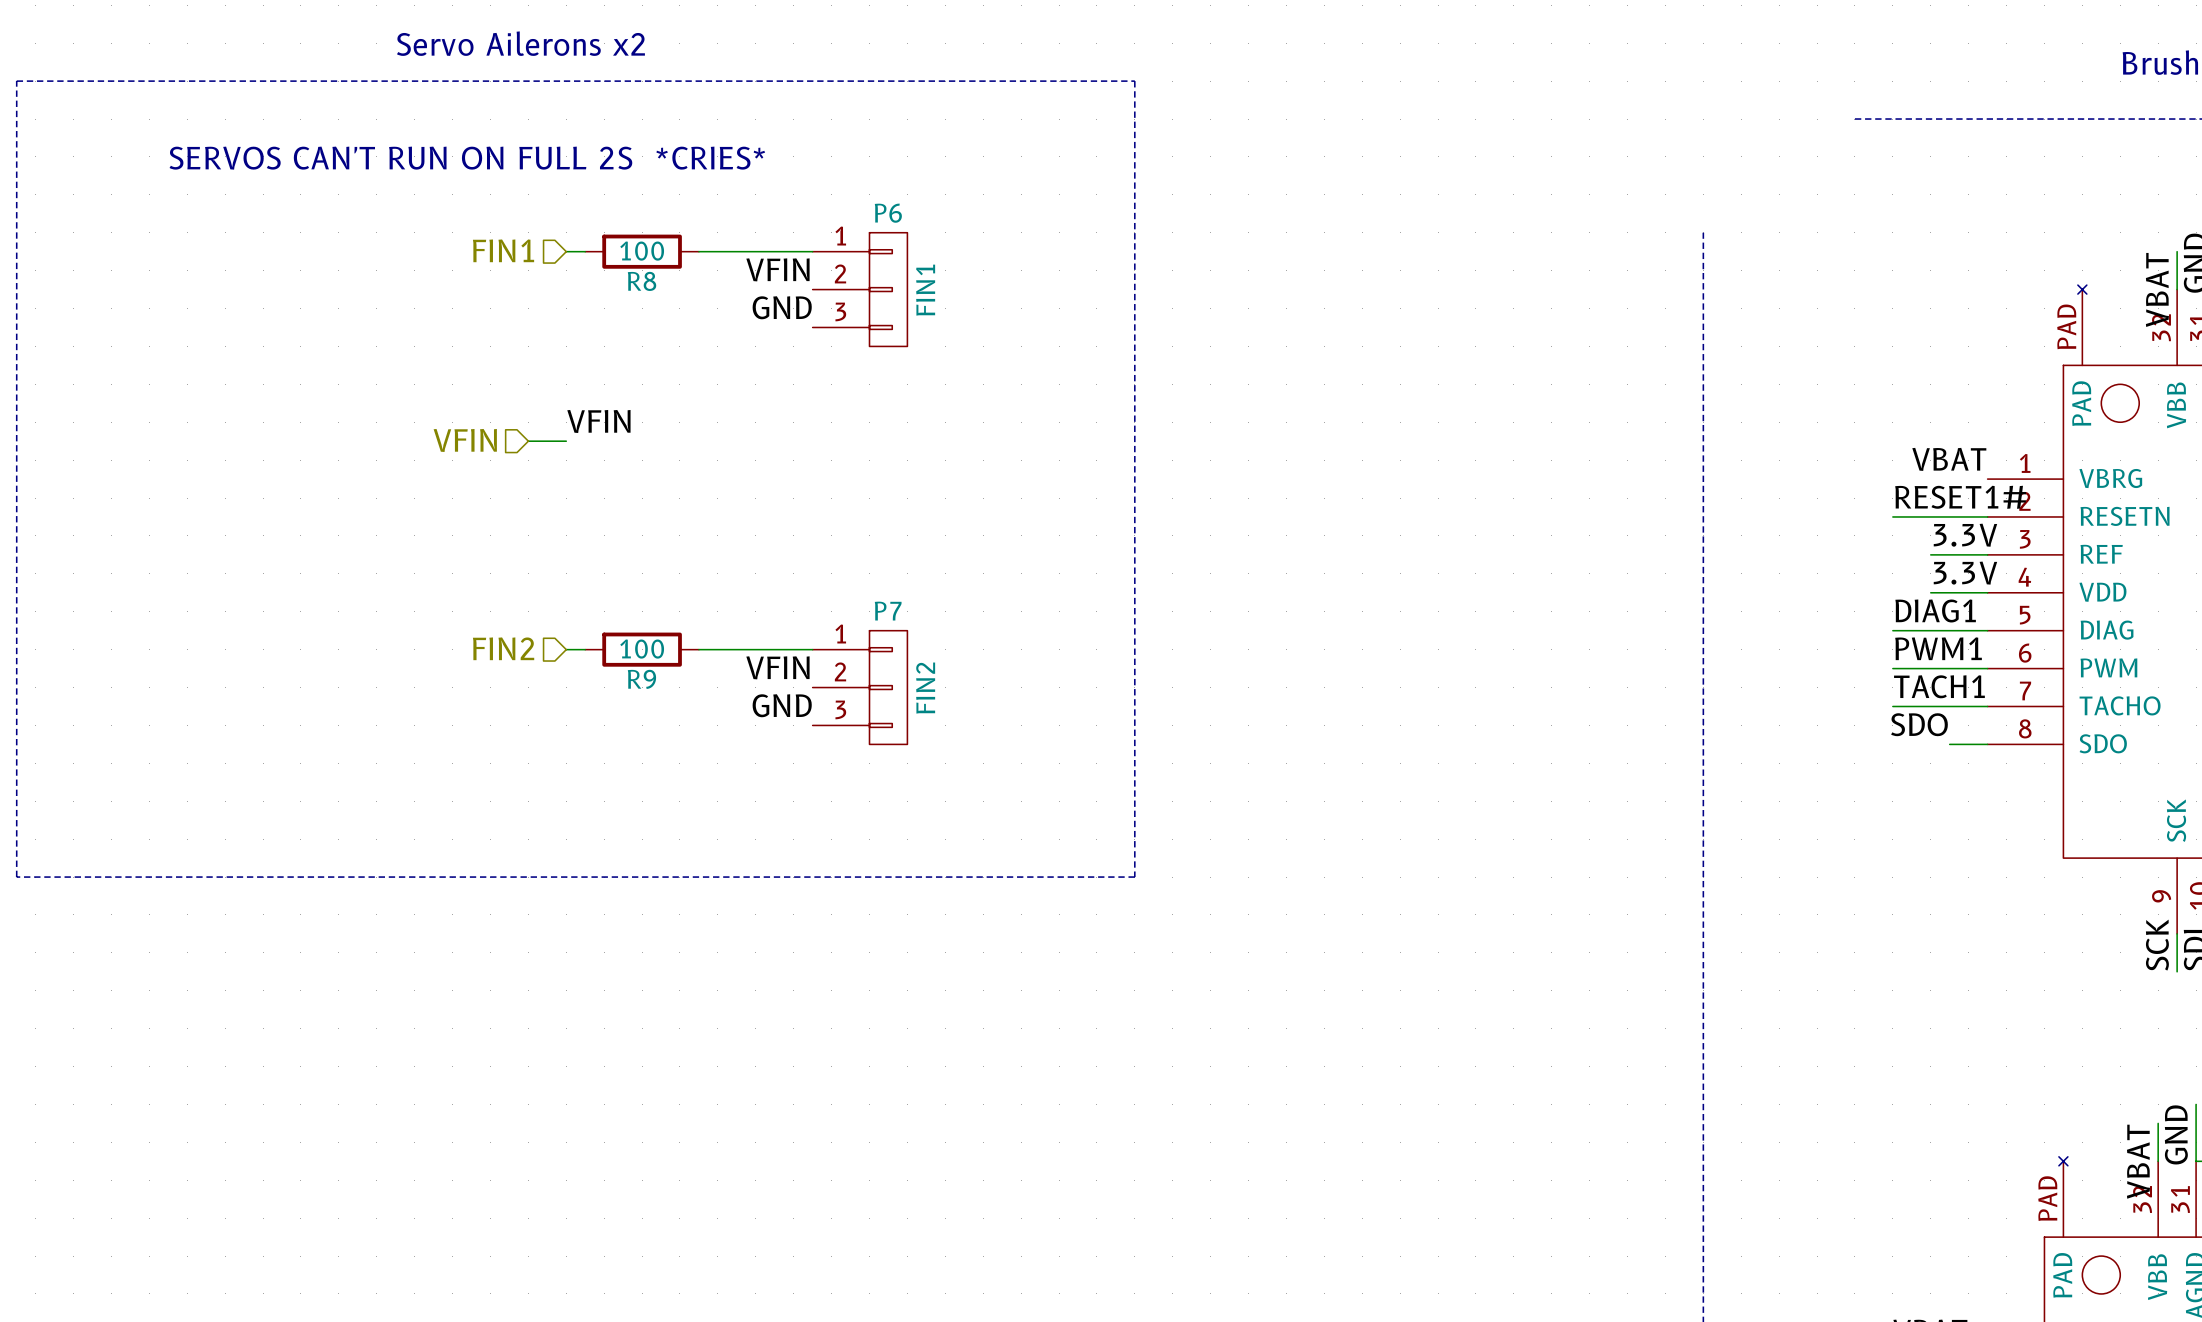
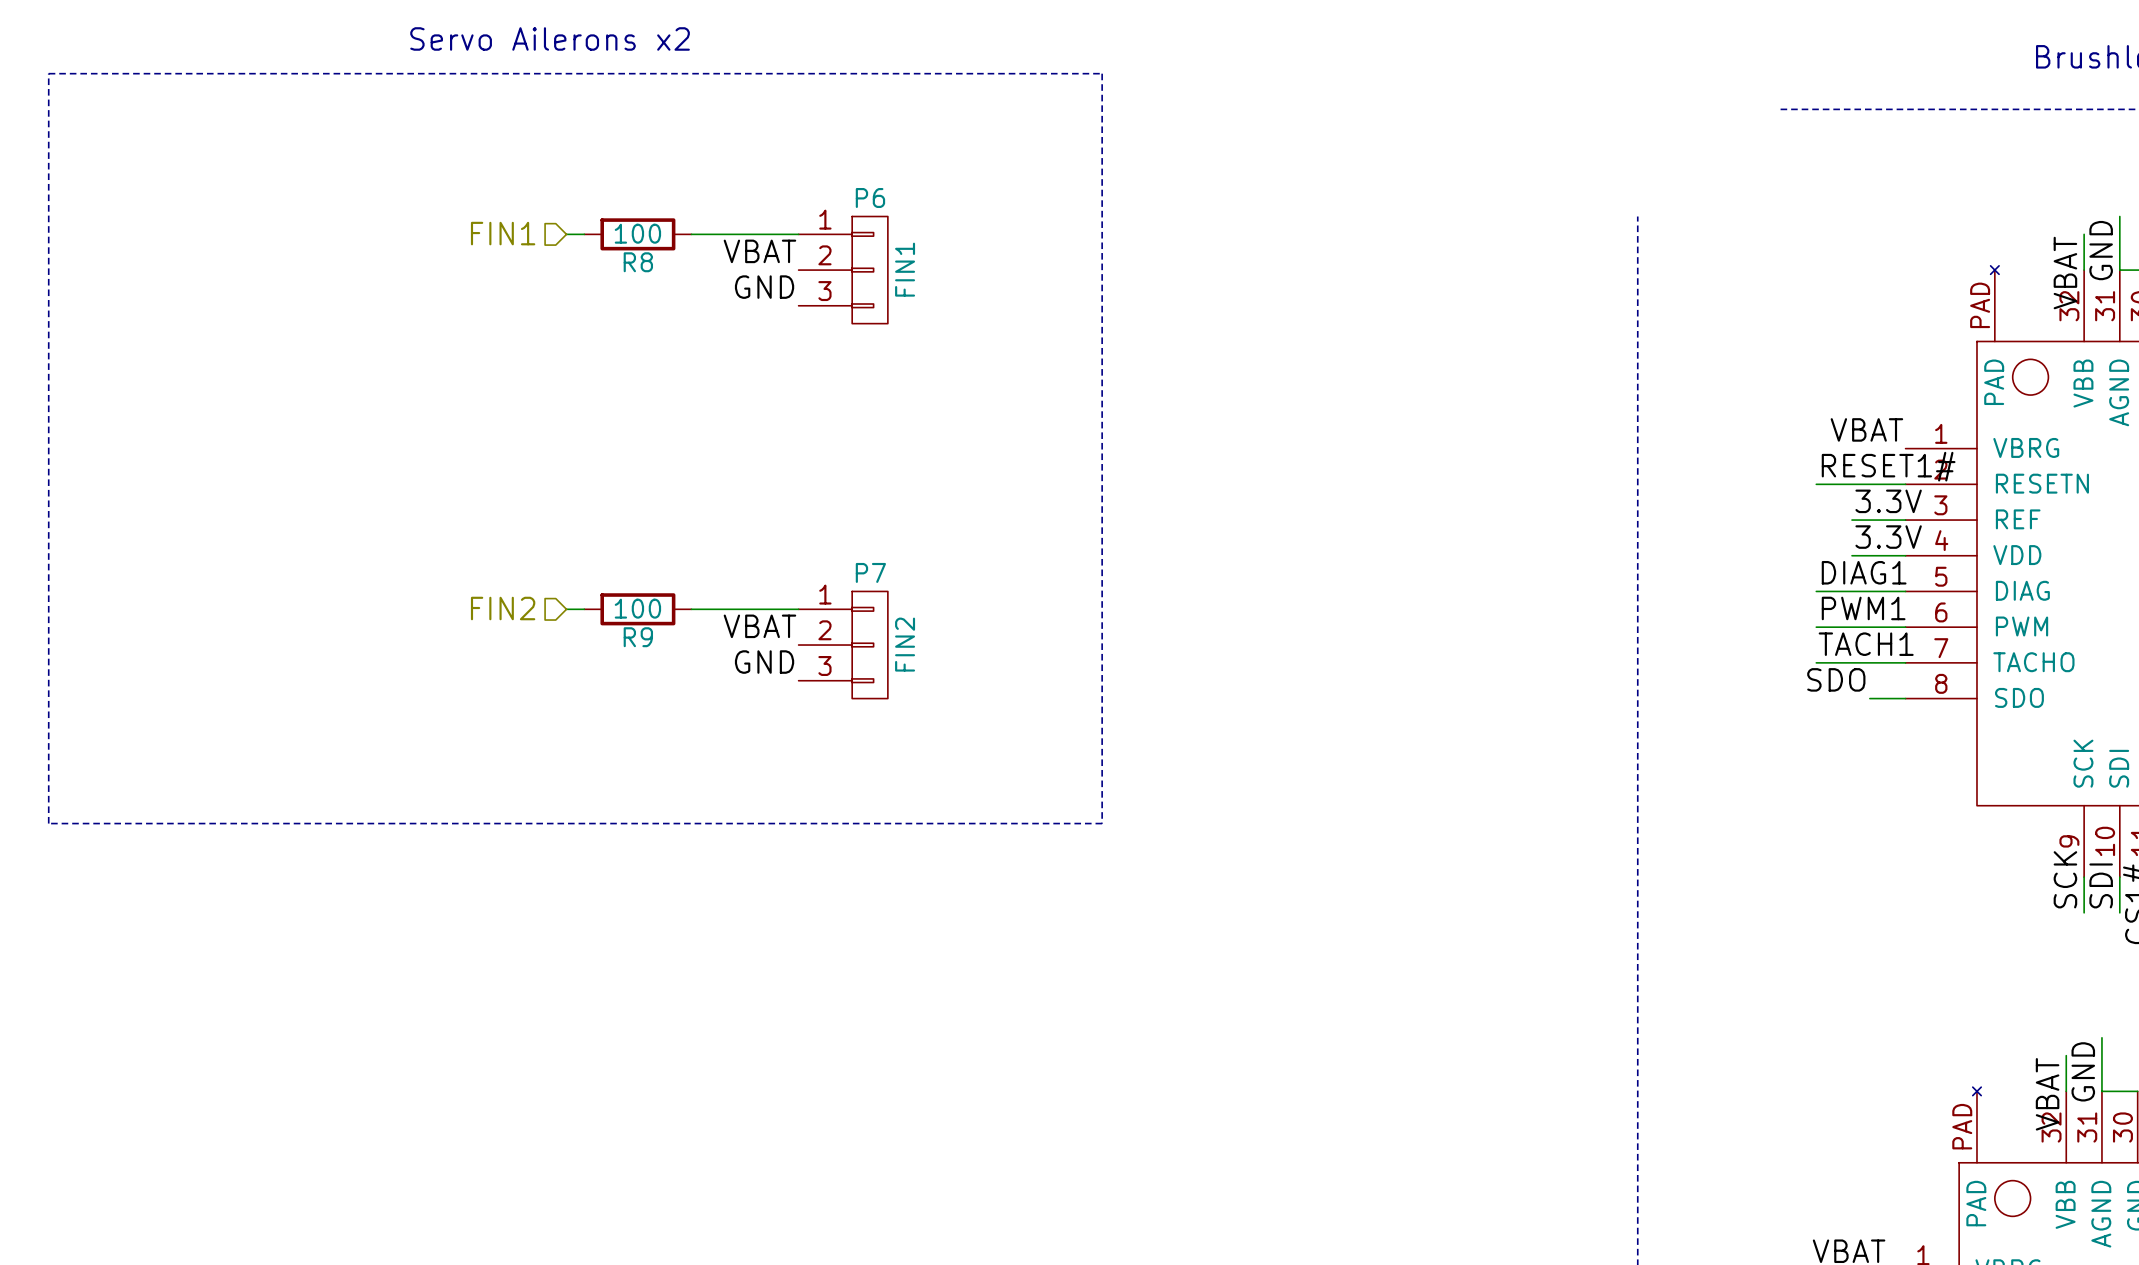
text: SERVOS CAN'T RUN ON FULL 2S *CRIES* (467, 158) -> none
label: VFIN (777, 269) -> VBAT (759, 251)
label: VFIN (598, 421) -> none
hierarchical label: VFIN (465, 440) -> none
wire: (528, 441) (566, 441) -> none
label: VFIN (777, 667) -> VBAT (759, 626)

